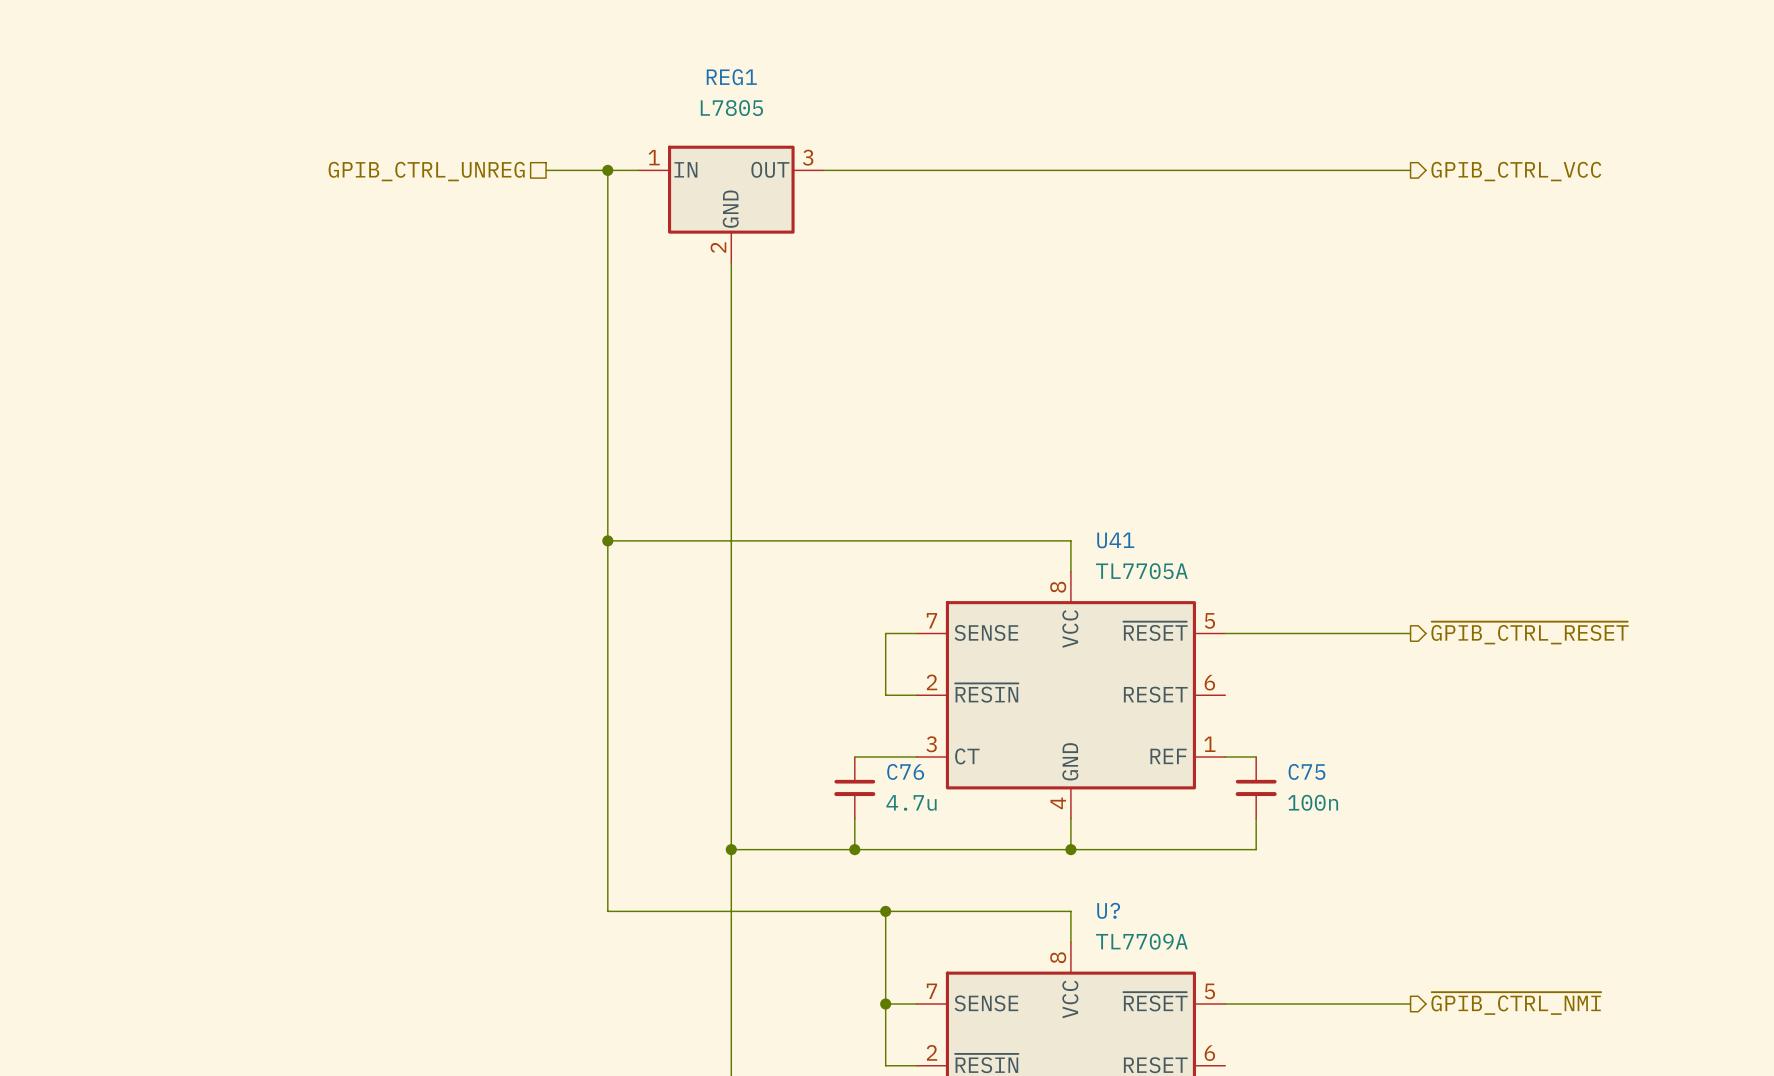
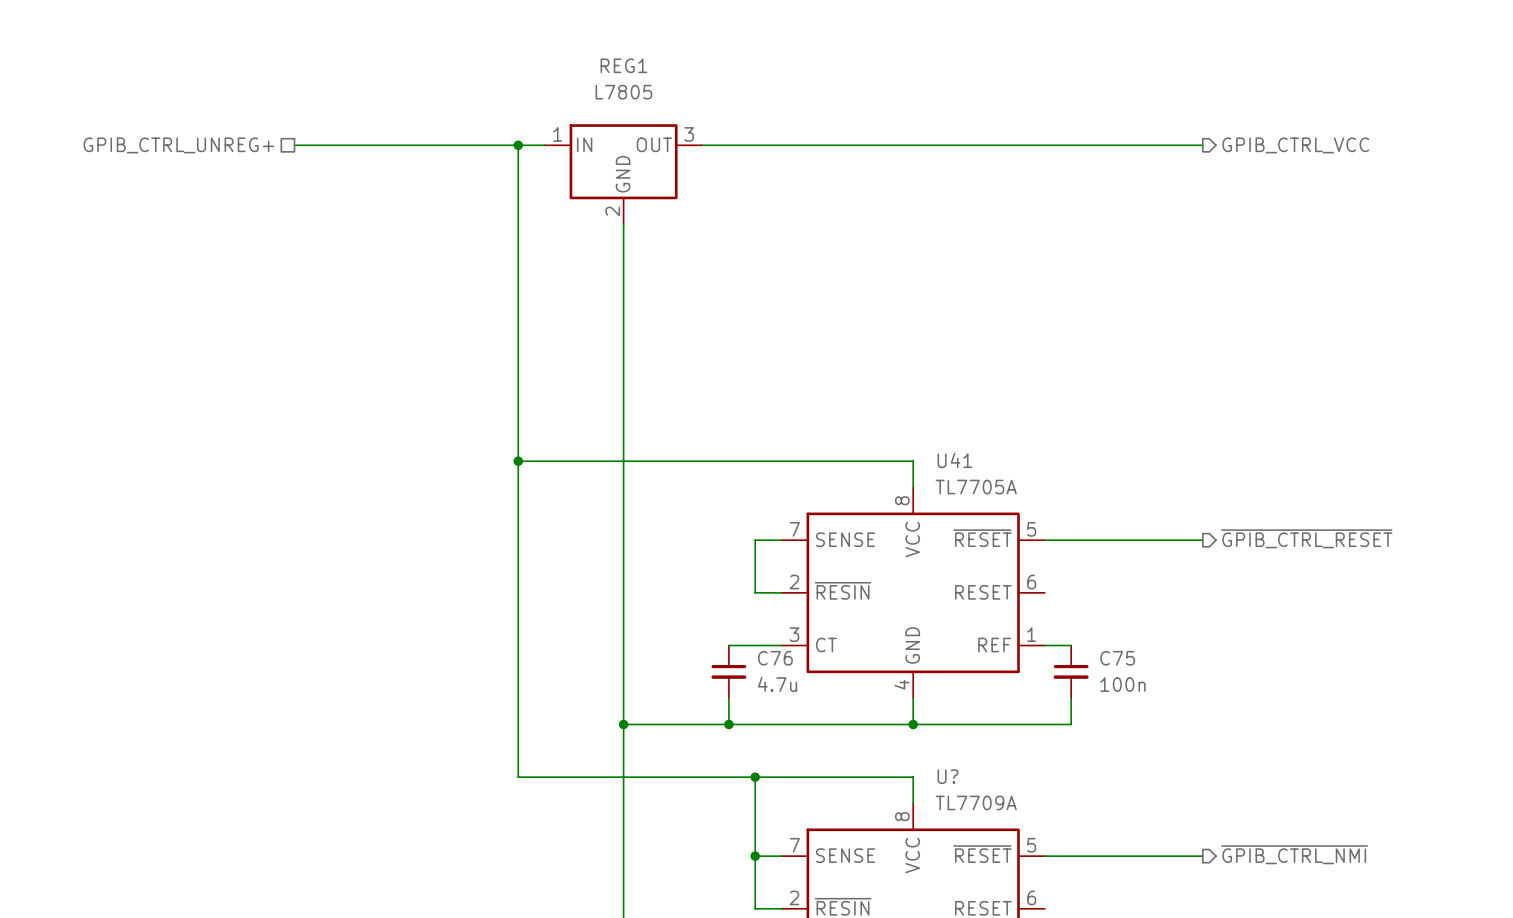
wire: none -> (294, 145) (465, 145)
hierarchical label: GPIB_CTRL_UNREG (426, 171) -> GPIB_CTRL_UNREG+ (178, 145)

